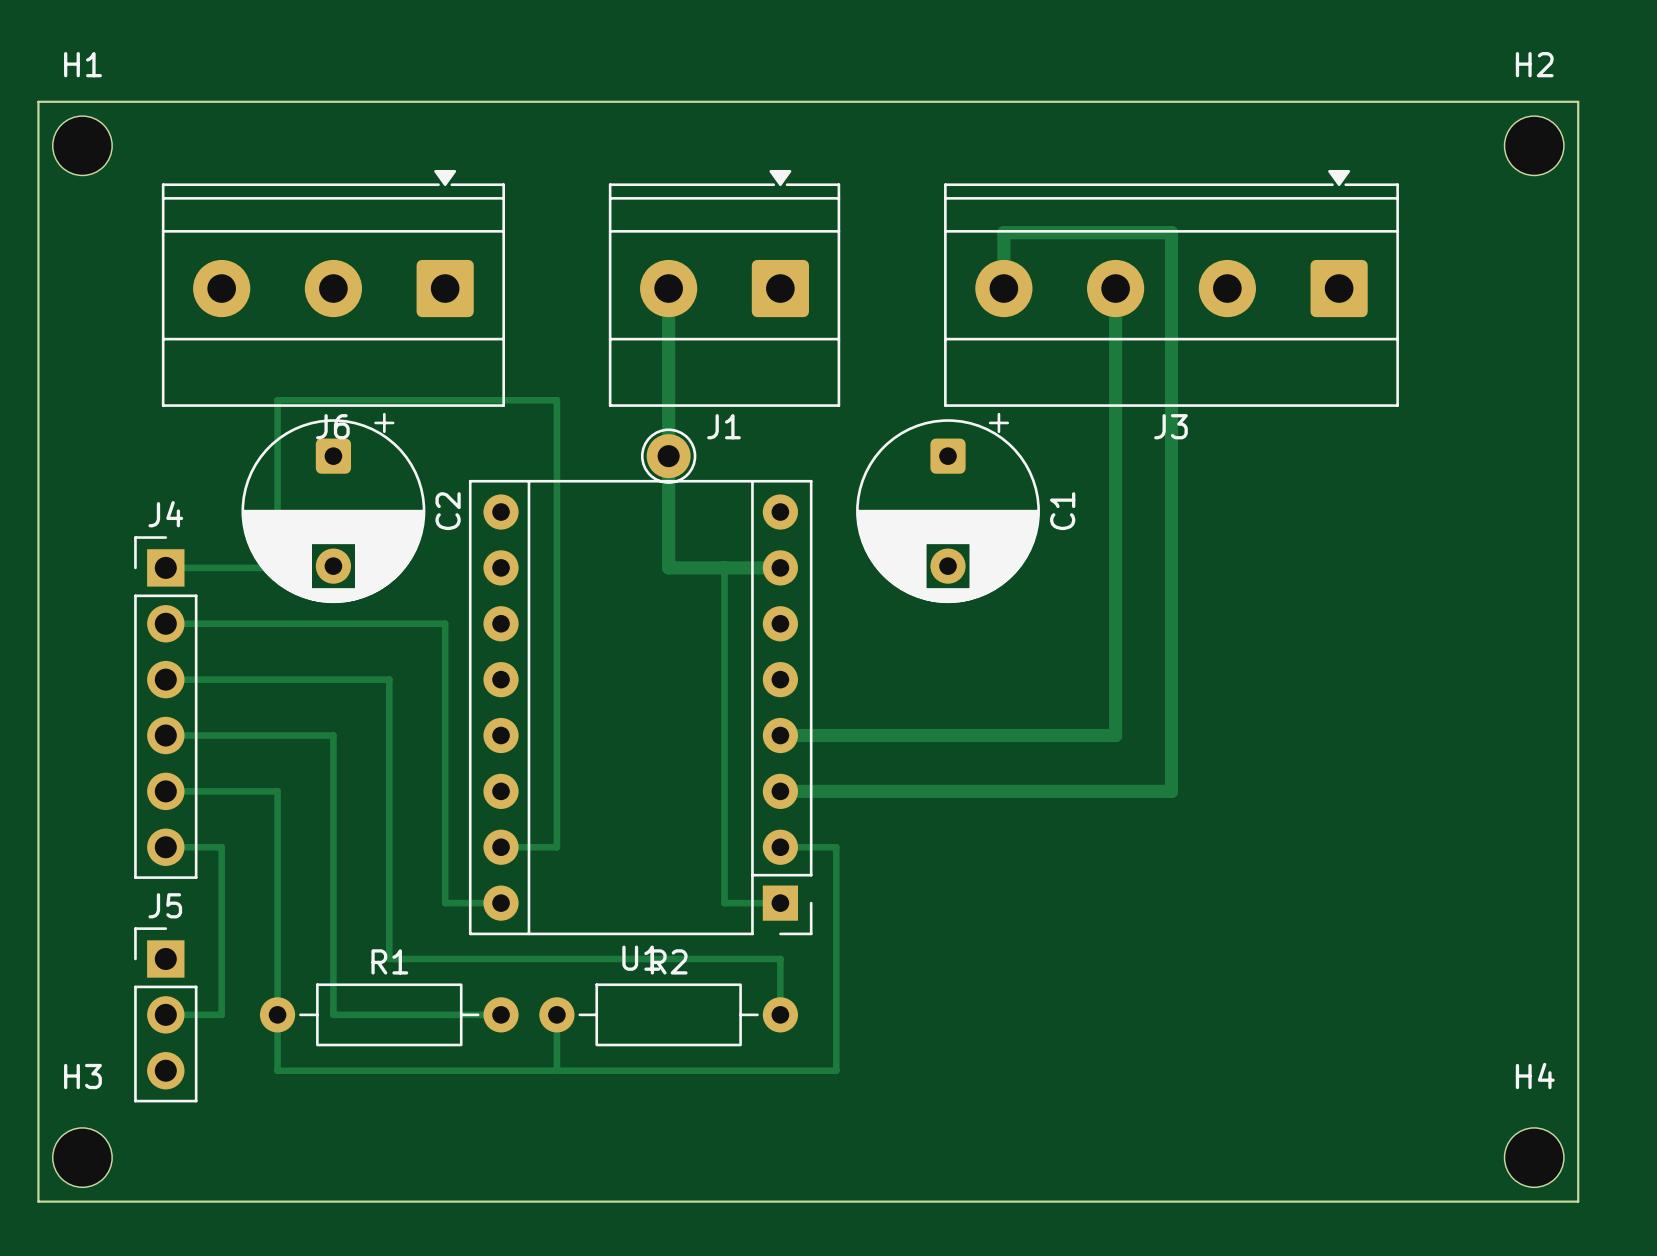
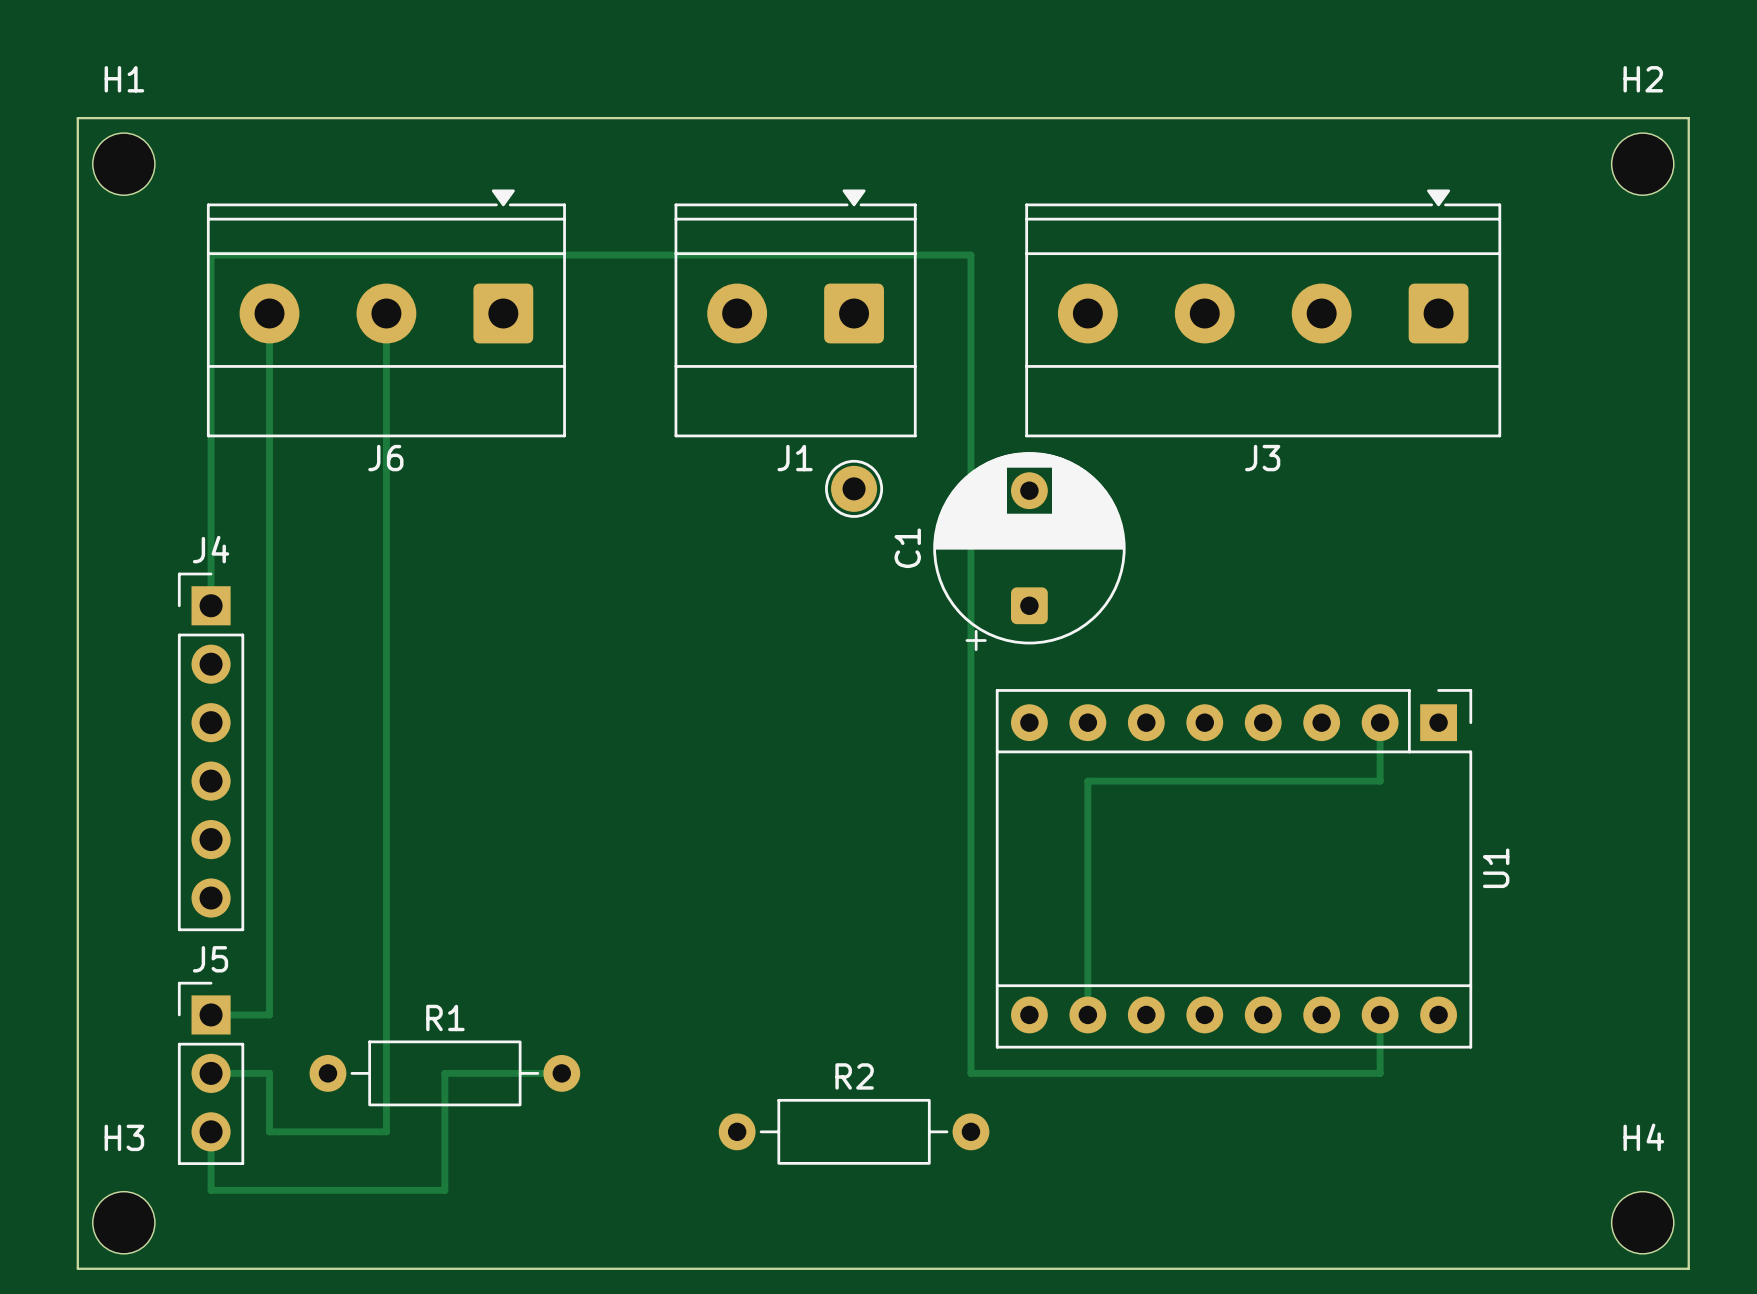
track: (668, 288) (668, 567) (780, 567) -> none
track: (1003, 288) (1003, 232) (1171, 232) (1171, 791) (780, 791) -> none
track: (1115, 288) (1115, 735) -> (1380, 722) (1380, 781) (1204, 781)
part position: (668, 456) -> (854, 488)
C2: (333, 507) -> none
C1 rotation: 0° (948, 507) -> 180° (1029, 551)
track: (165, 567) (277, 567) (277, 400) (556, 400) (556, 847) (501, 847) -> (211, 605) (211, 255) (970, 255) (970, 1073) (1380, 1073) (1380, 1014)
track: (724, 567) (724, 903) (780, 903) -> none
track: (165, 623) (445, 623) (445, 903) (501, 903) -> none
track: (165, 679) (389, 679) (389, 958) (780, 958) (780, 1014) -> none
U1 rotation: 0° (640, 707) -> 90° counterclockwise (1234, 868)
U1 position: (640, 707) -> (1234, 868)
track: (165, 735) (333, 735) -> (386, 313) (386, 781)
track: (780, 735) (1003, 735) -> (1087, 1014) (1087, 781)
track width: thick (1003, 735) (1115, 735) -> thin (1087, 781) (1204, 781)
track: (165, 791) (277, 791) (277, 1070) -> (269, 1073) (269, 1131) (327, 1131)
track: (165, 847) (221, 847) -> (269, 313) (269, 898)
track: (780, 847) (836, 847) (836, 1070) (333, 1070) -> none
track: (221, 958) (221, 1014) -> (269, 1014) (211, 1014)
track: (333, 1014) (389, 1014) -> (386, 1073) (386, 1131)
track: none -> (444, 1073) (444, 1190) (211, 1190) (211, 1131)
track: (556, 1014) (556, 1070) -> none
R2 position: (668, 1014) -> (854, 1131)

